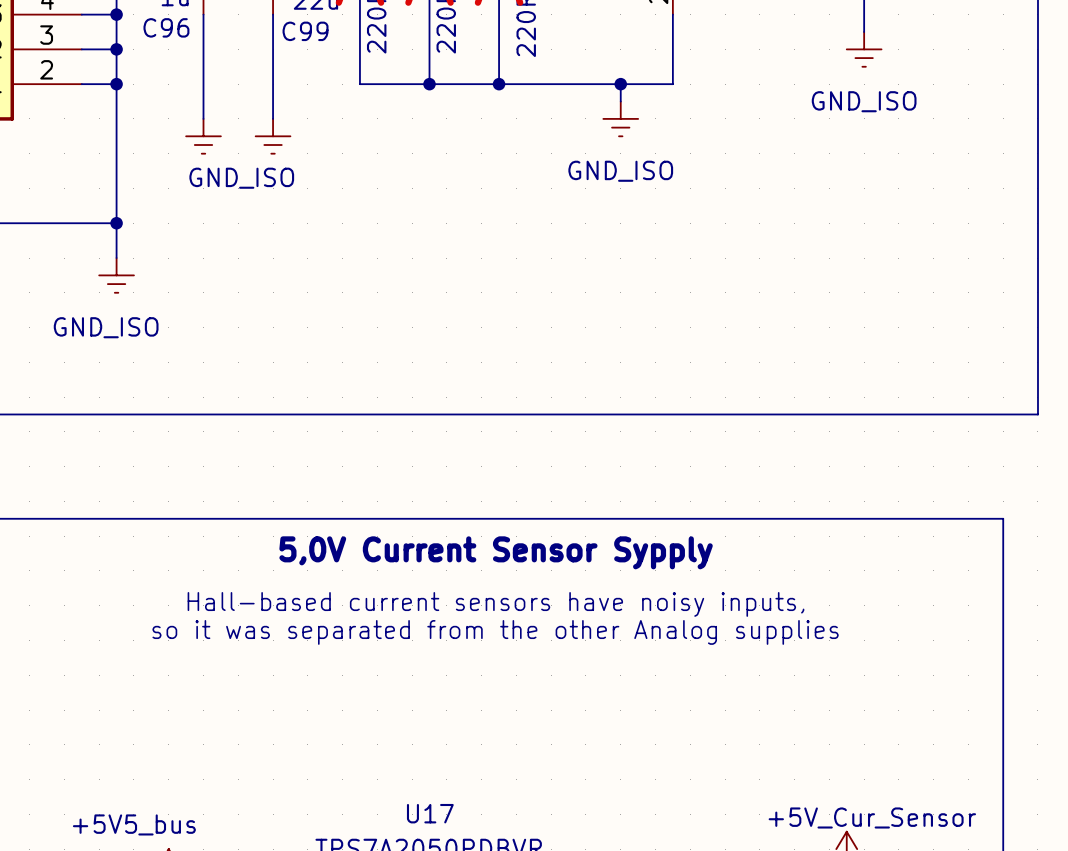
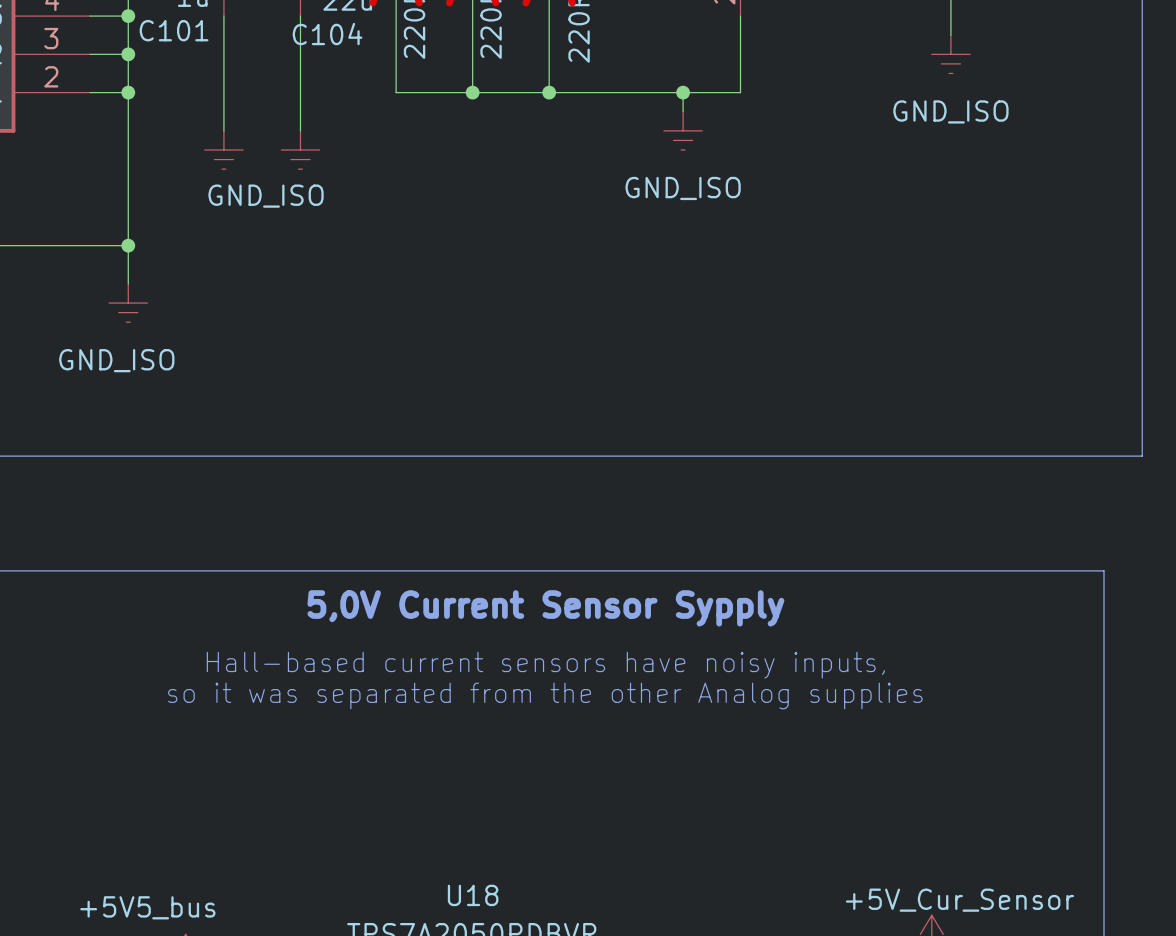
C96 name: C96 (166, 27) -> C101 (174, 30)
C99 name: C99 (305, 31) -> C104 (327, 34)
U17 name: U17 (430, 813) -> U18 (473, 895)

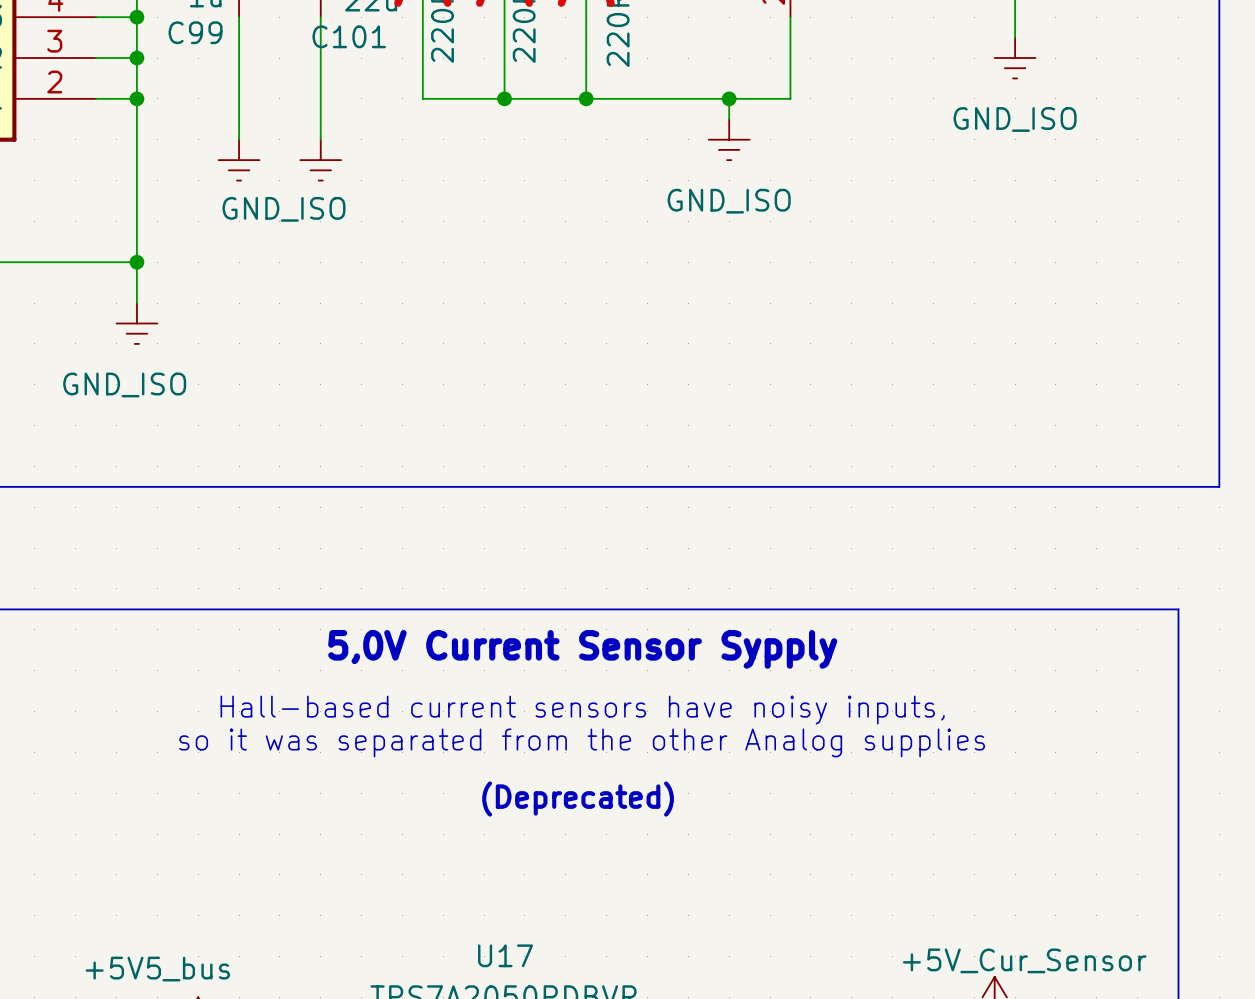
C101 name: C101 (174, 30) -> C99 (195, 32)
C104 name: C104 (327, 34) -> C101 (349, 36)
text: none -> (Deprecated) (578, 799)
U18 name: U18 (473, 895) -> U17 (505, 955)

